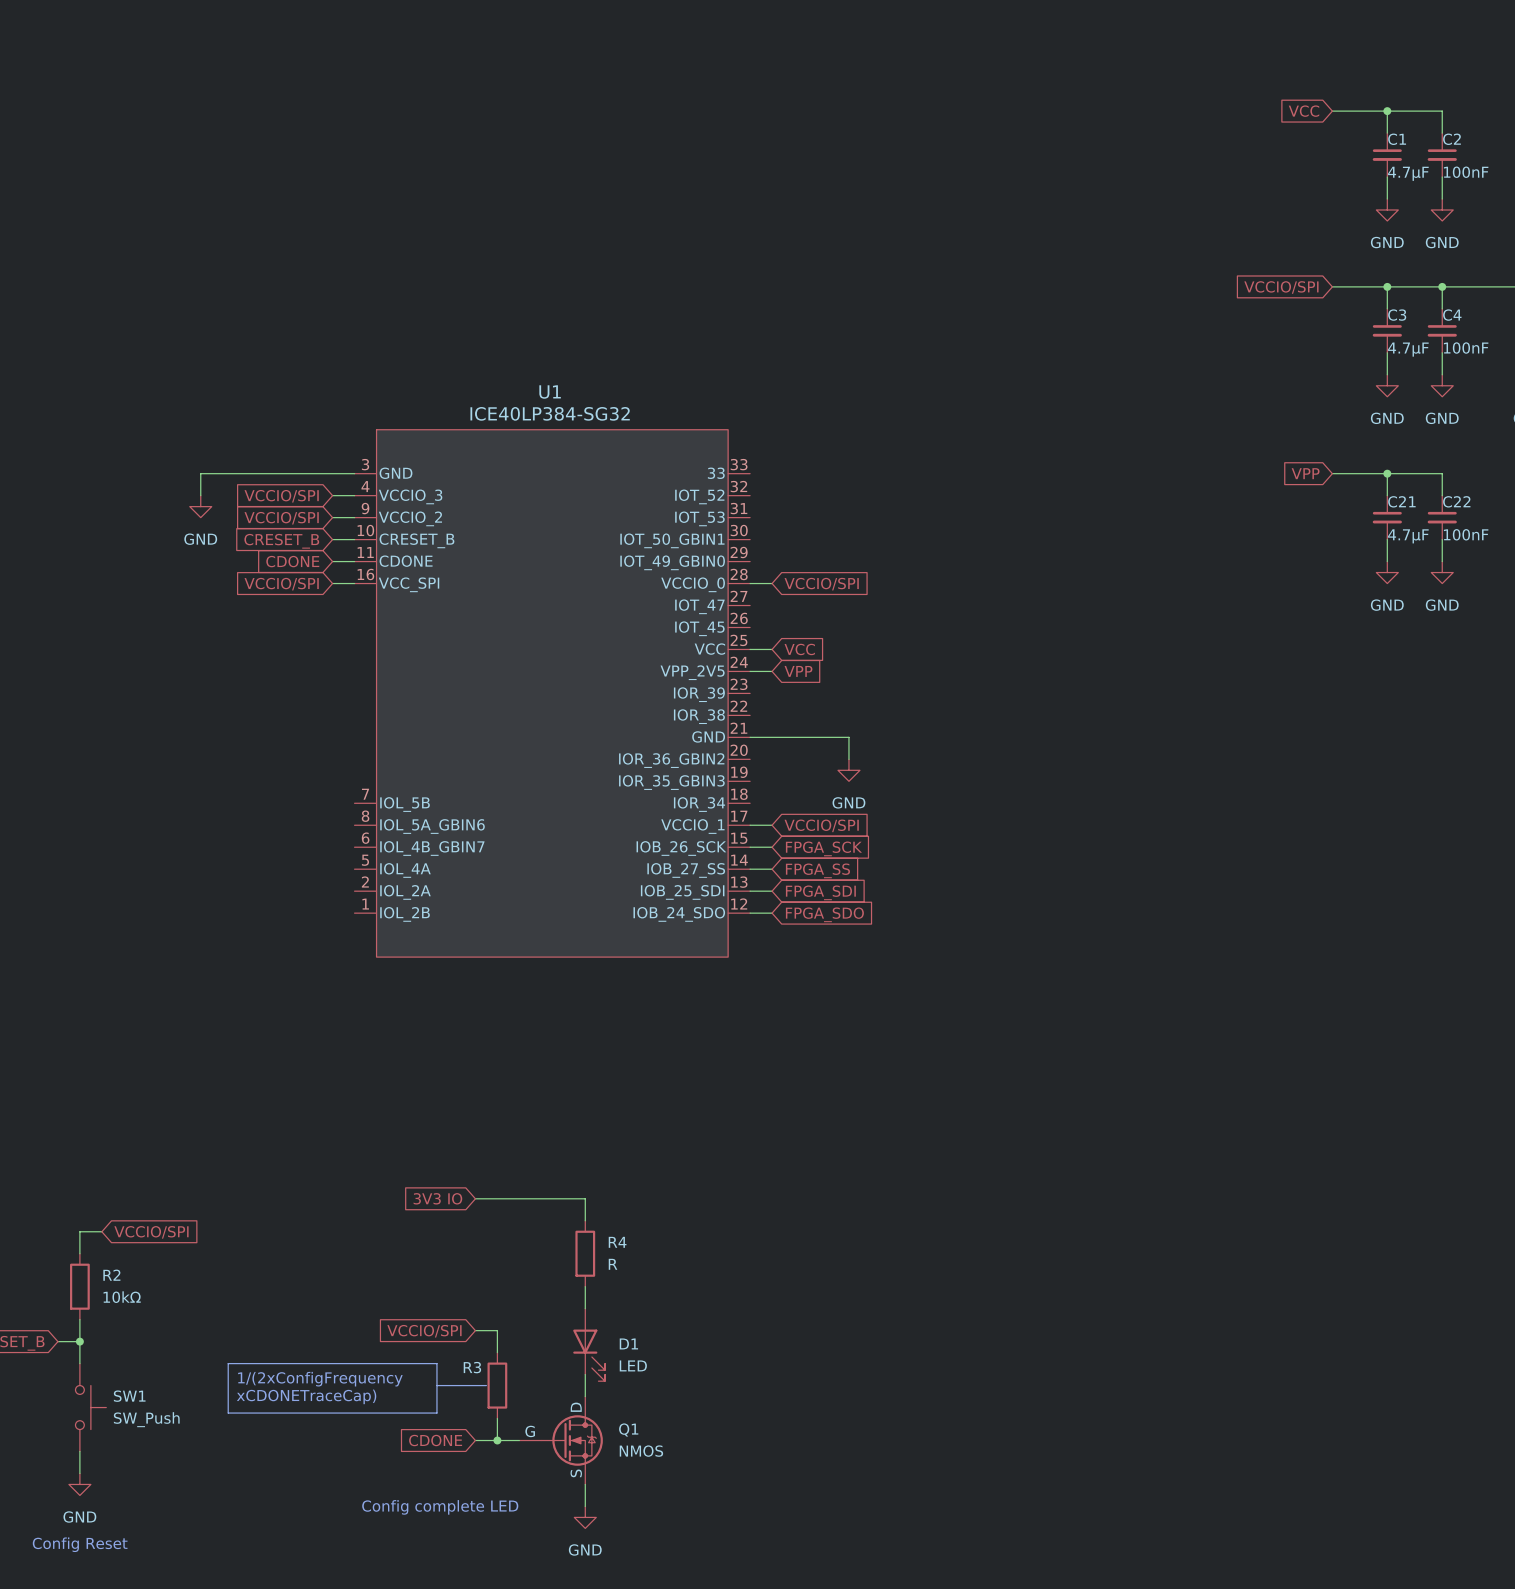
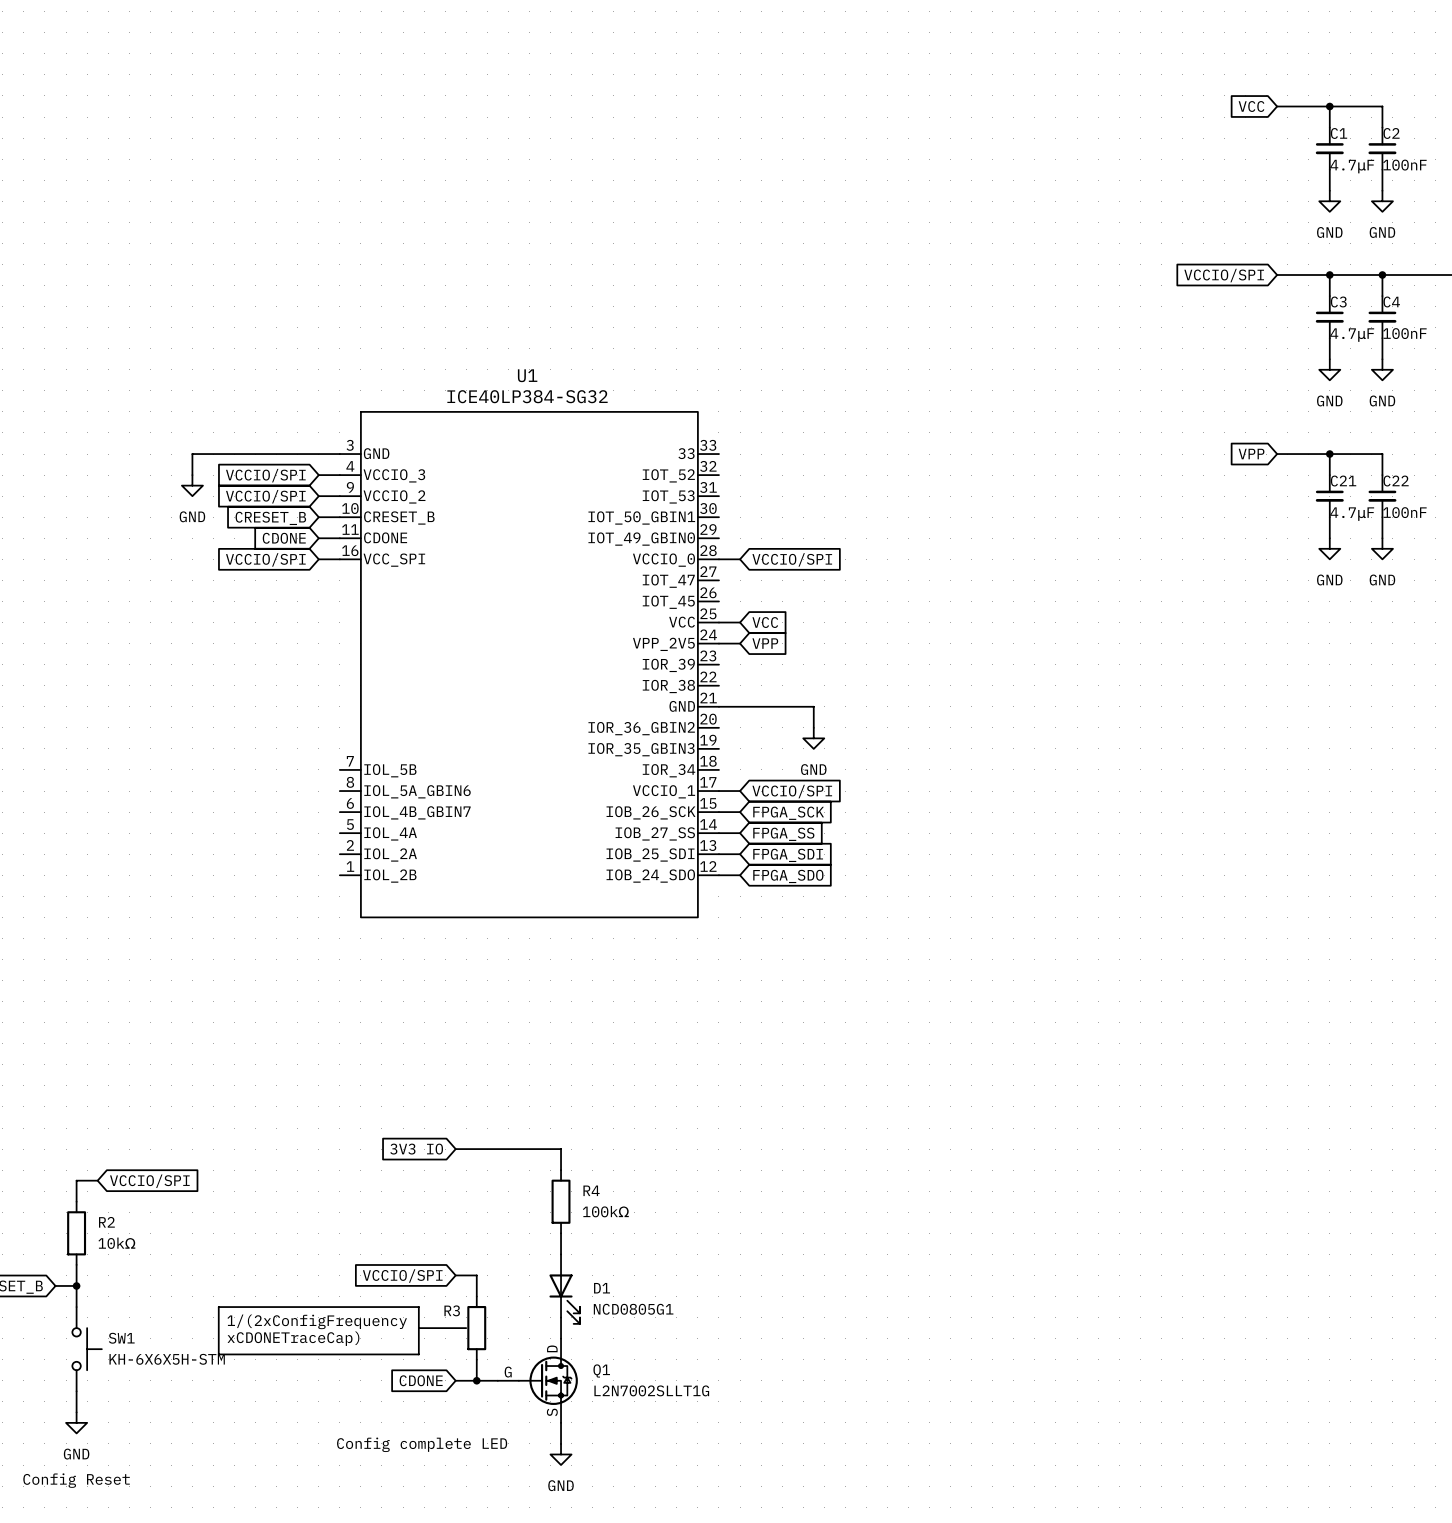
R4 value: R (613, 1264) -> 100kΩ (605, 1211)
D1 value: LED (633, 1365) -> NCD0805G1 (633, 1309)
SW1 value: SW_Push (146, 1419) -> KH-6X6X5H-STM (167, 1359)
Q1 value: NMOS (641, 1451) -> L2N7002SLLT1G (651, 1390)

